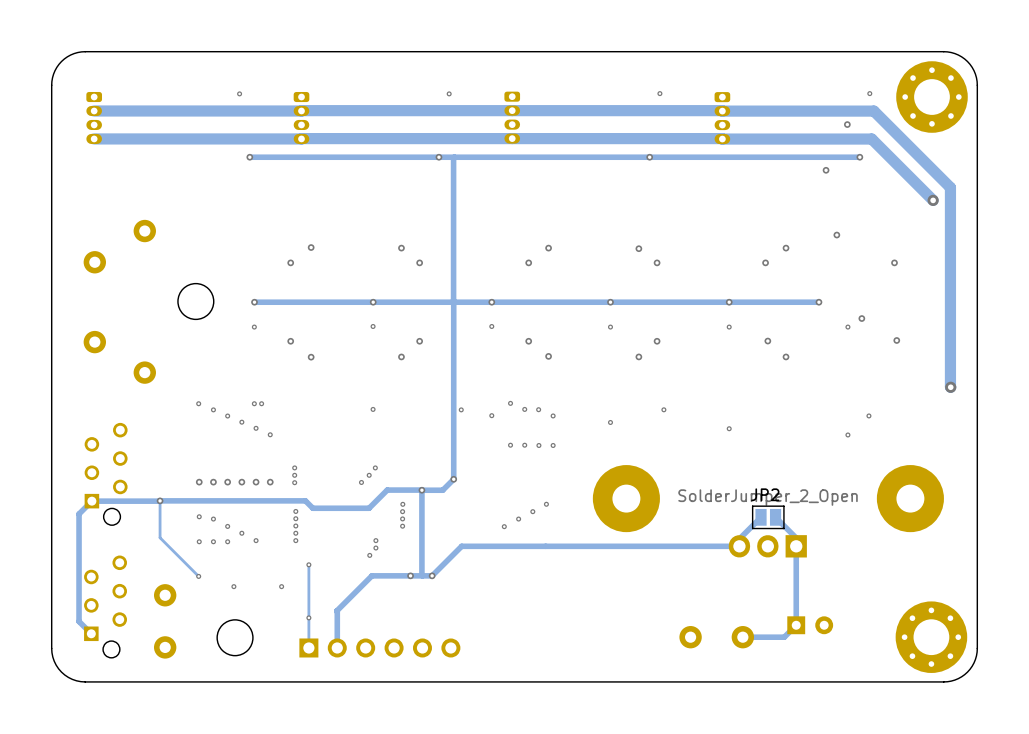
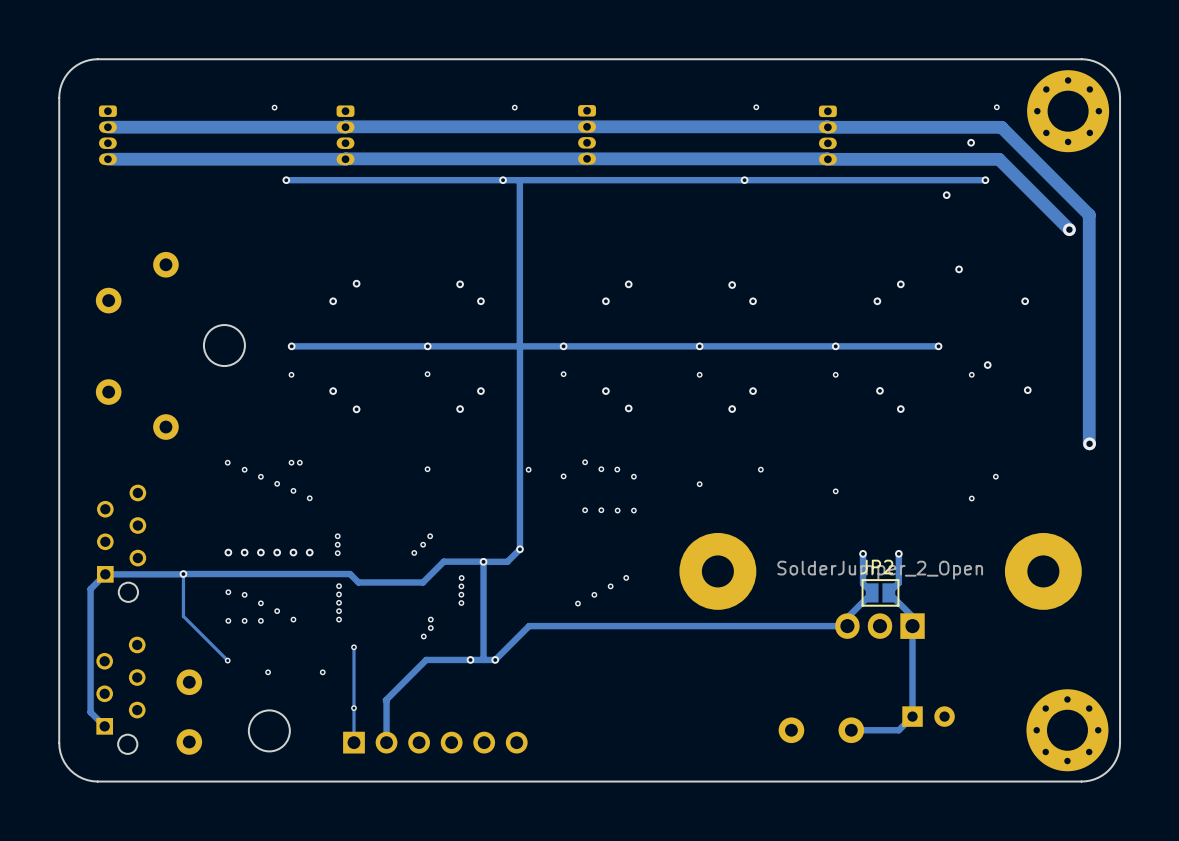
track: none -> (863, 553) (863, 583) (872, 592)
via: none -> (863, 553)
track: none -> (898, 553) (898, 582) (888, 592)
via: none -> (898, 553)

